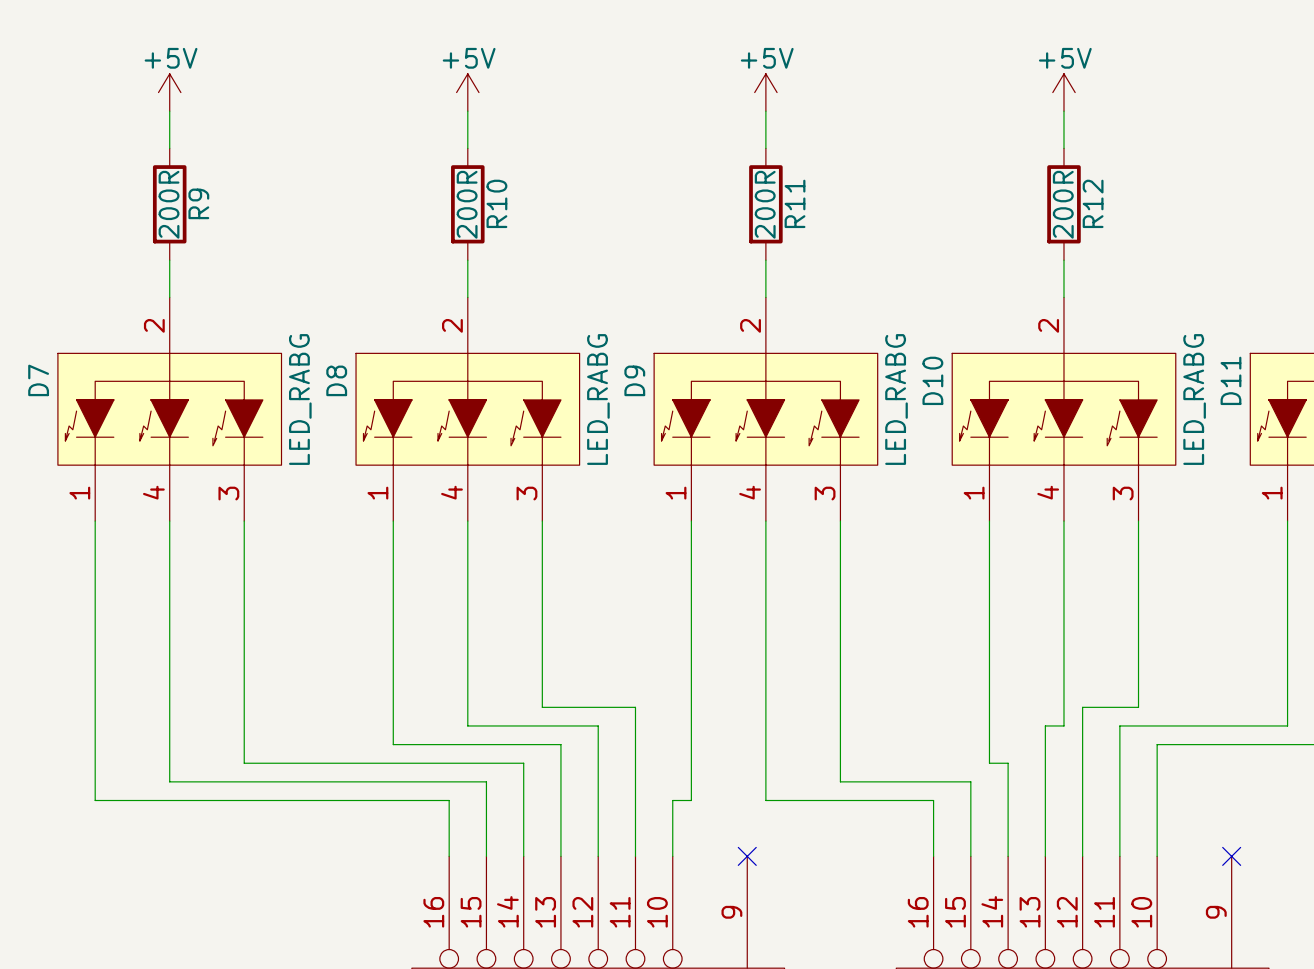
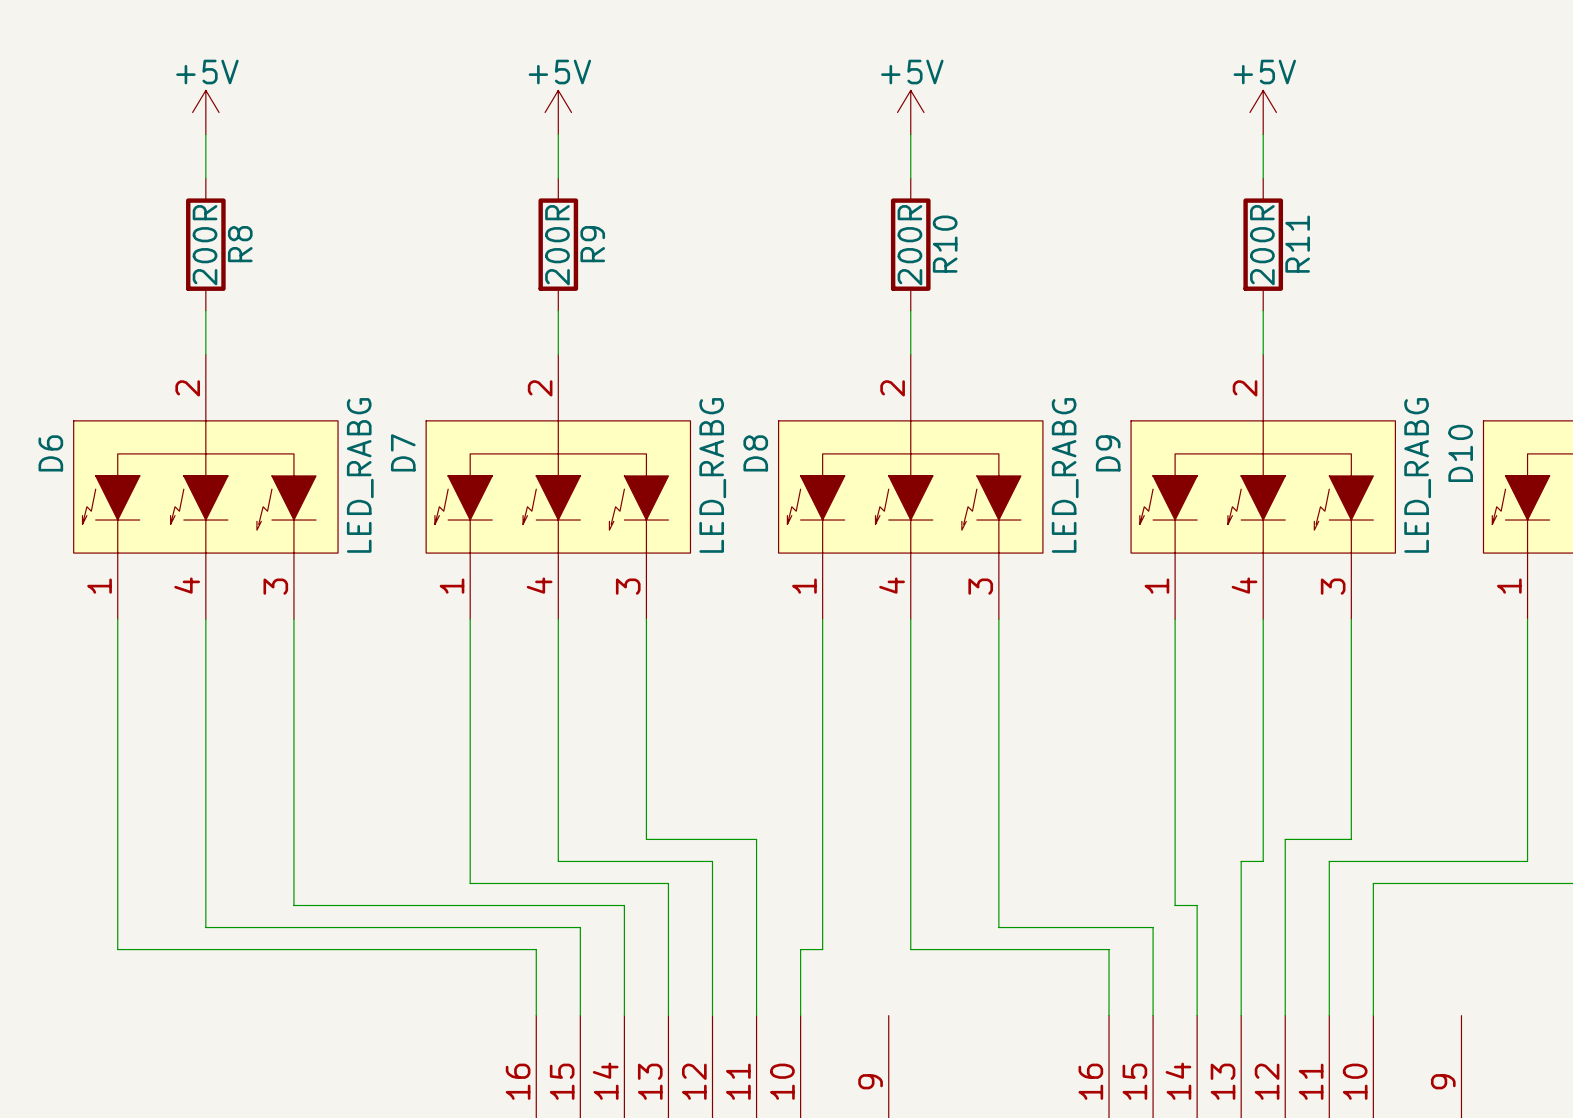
R9 name: R9 (198, 203) -> R8 (240, 244)
R10 name: R10 (496, 203) -> R9 (592, 244)
R11 name: R11 (795, 203) -> R10 (945, 244)
R12 name: R12 (1093, 203) -> R11 (1297, 244)
D7 name: D7 (38, 380) -> D6 (50, 453)
D8 name: D8 (336, 380) -> D7 (403, 452)
D9 name: D9 (634, 380) -> D8 (755, 453)
D10 name: D10 (932, 380) -> D9 (1108, 453)
D11 name: D11 (1230, 380) -> D10 (1460, 453)
no-connect mark: (747, 856) -> none
no-connect mark: (1231, 856) -> none

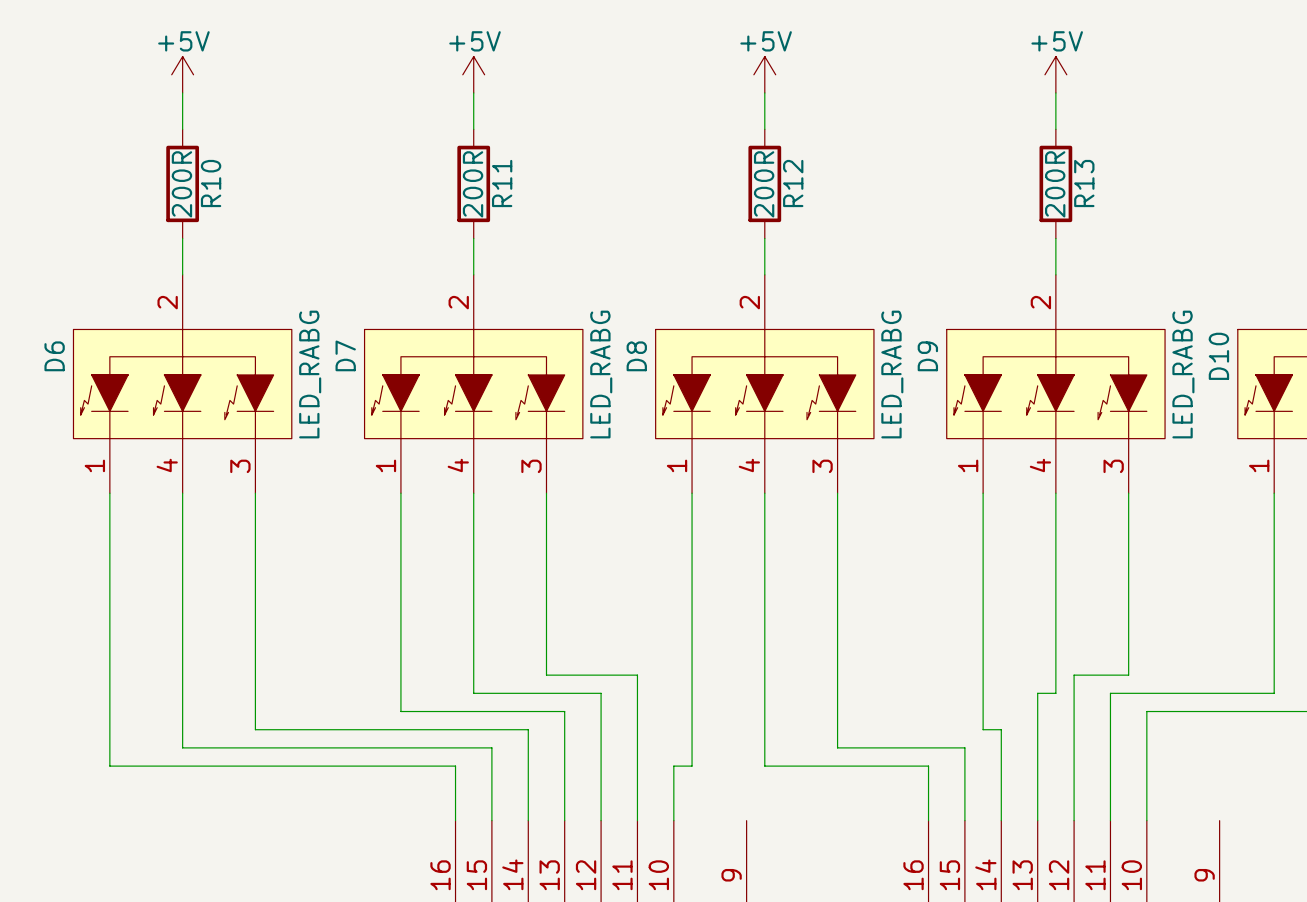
R8 name: R8 (240, 244) -> R10 (211, 183)
R9 name: R9 (592, 244) -> R11 (502, 183)
R10 name: R10 (945, 244) -> R12 (793, 183)
R11 name: R11 (1297, 244) -> R13 (1084, 183)

